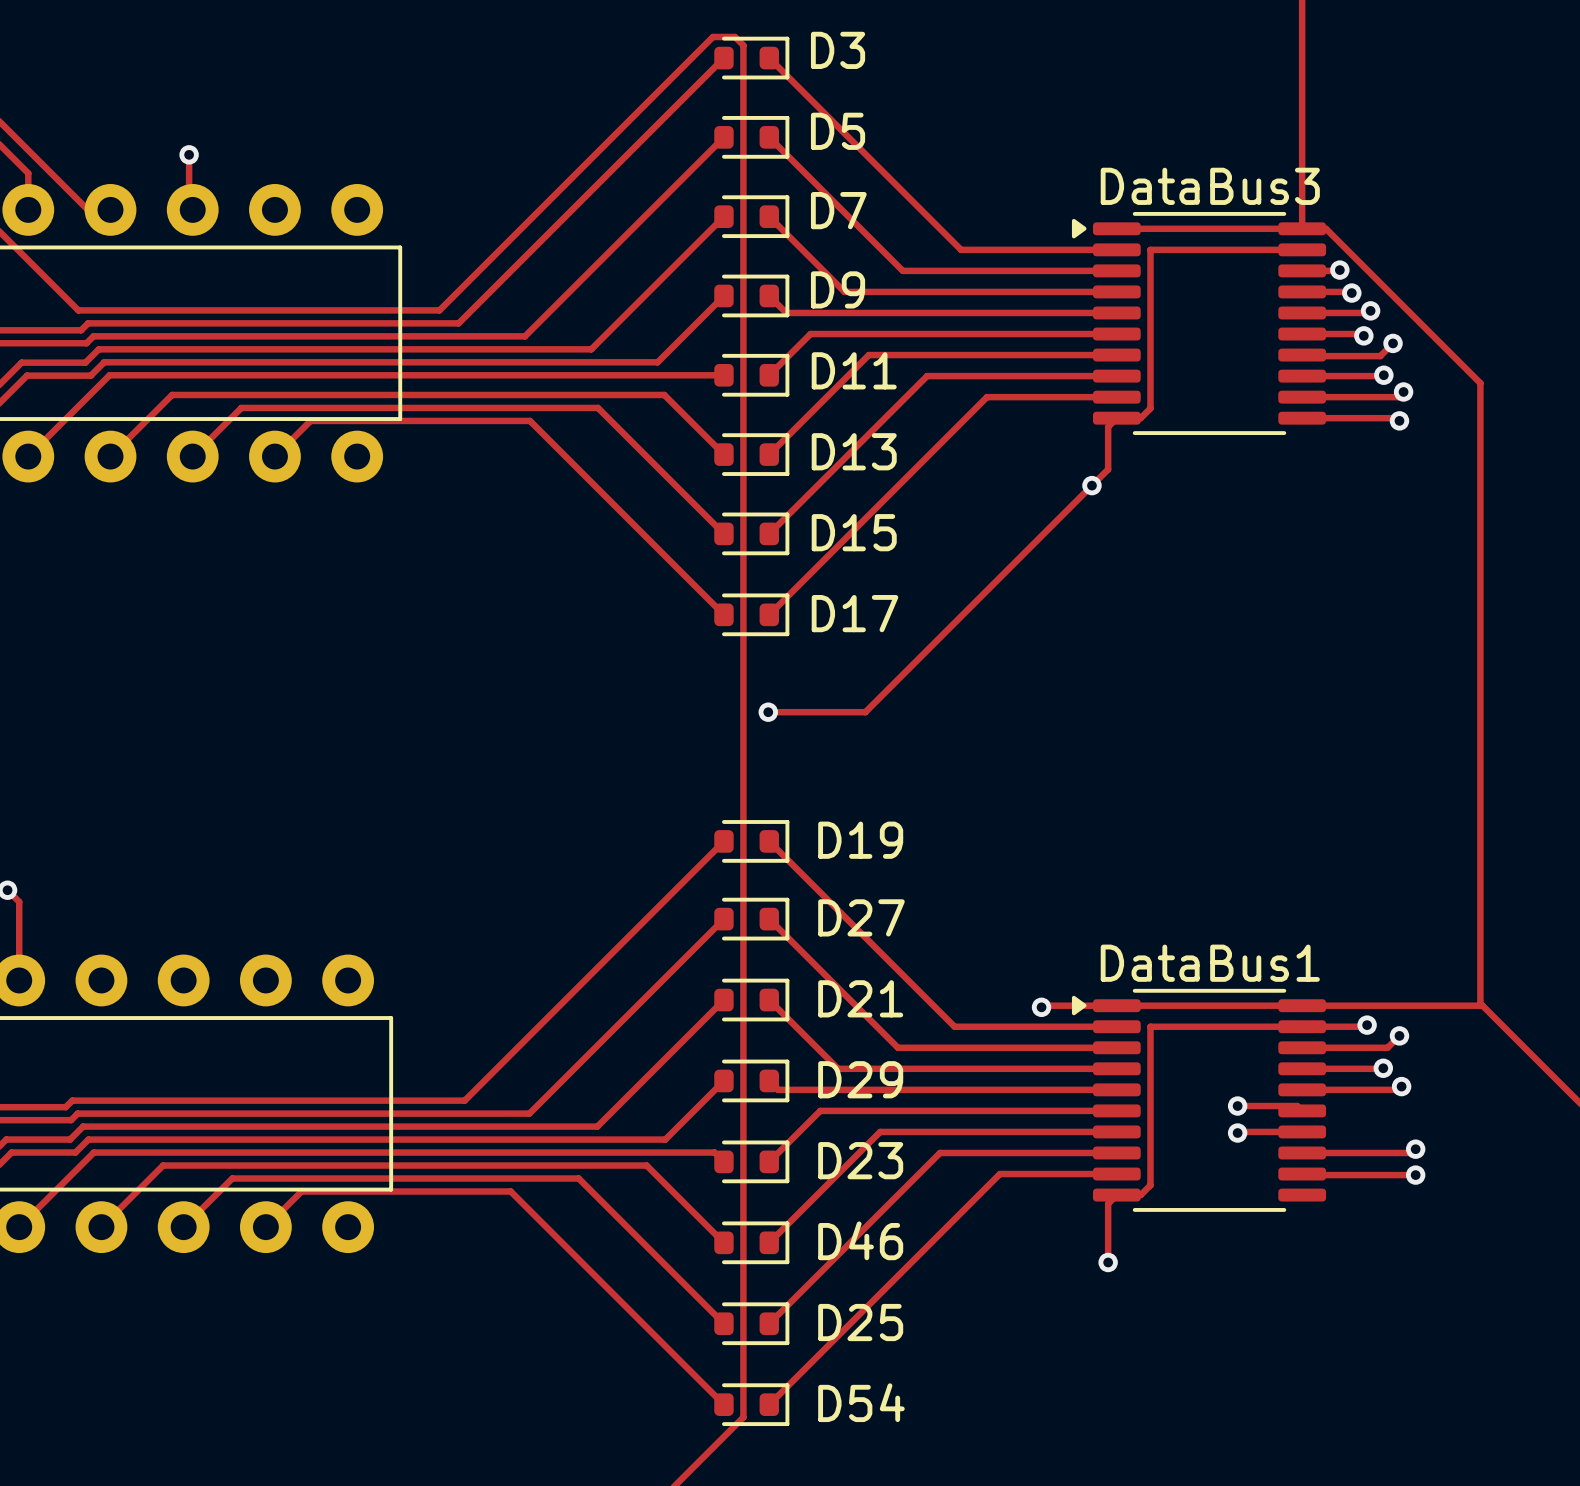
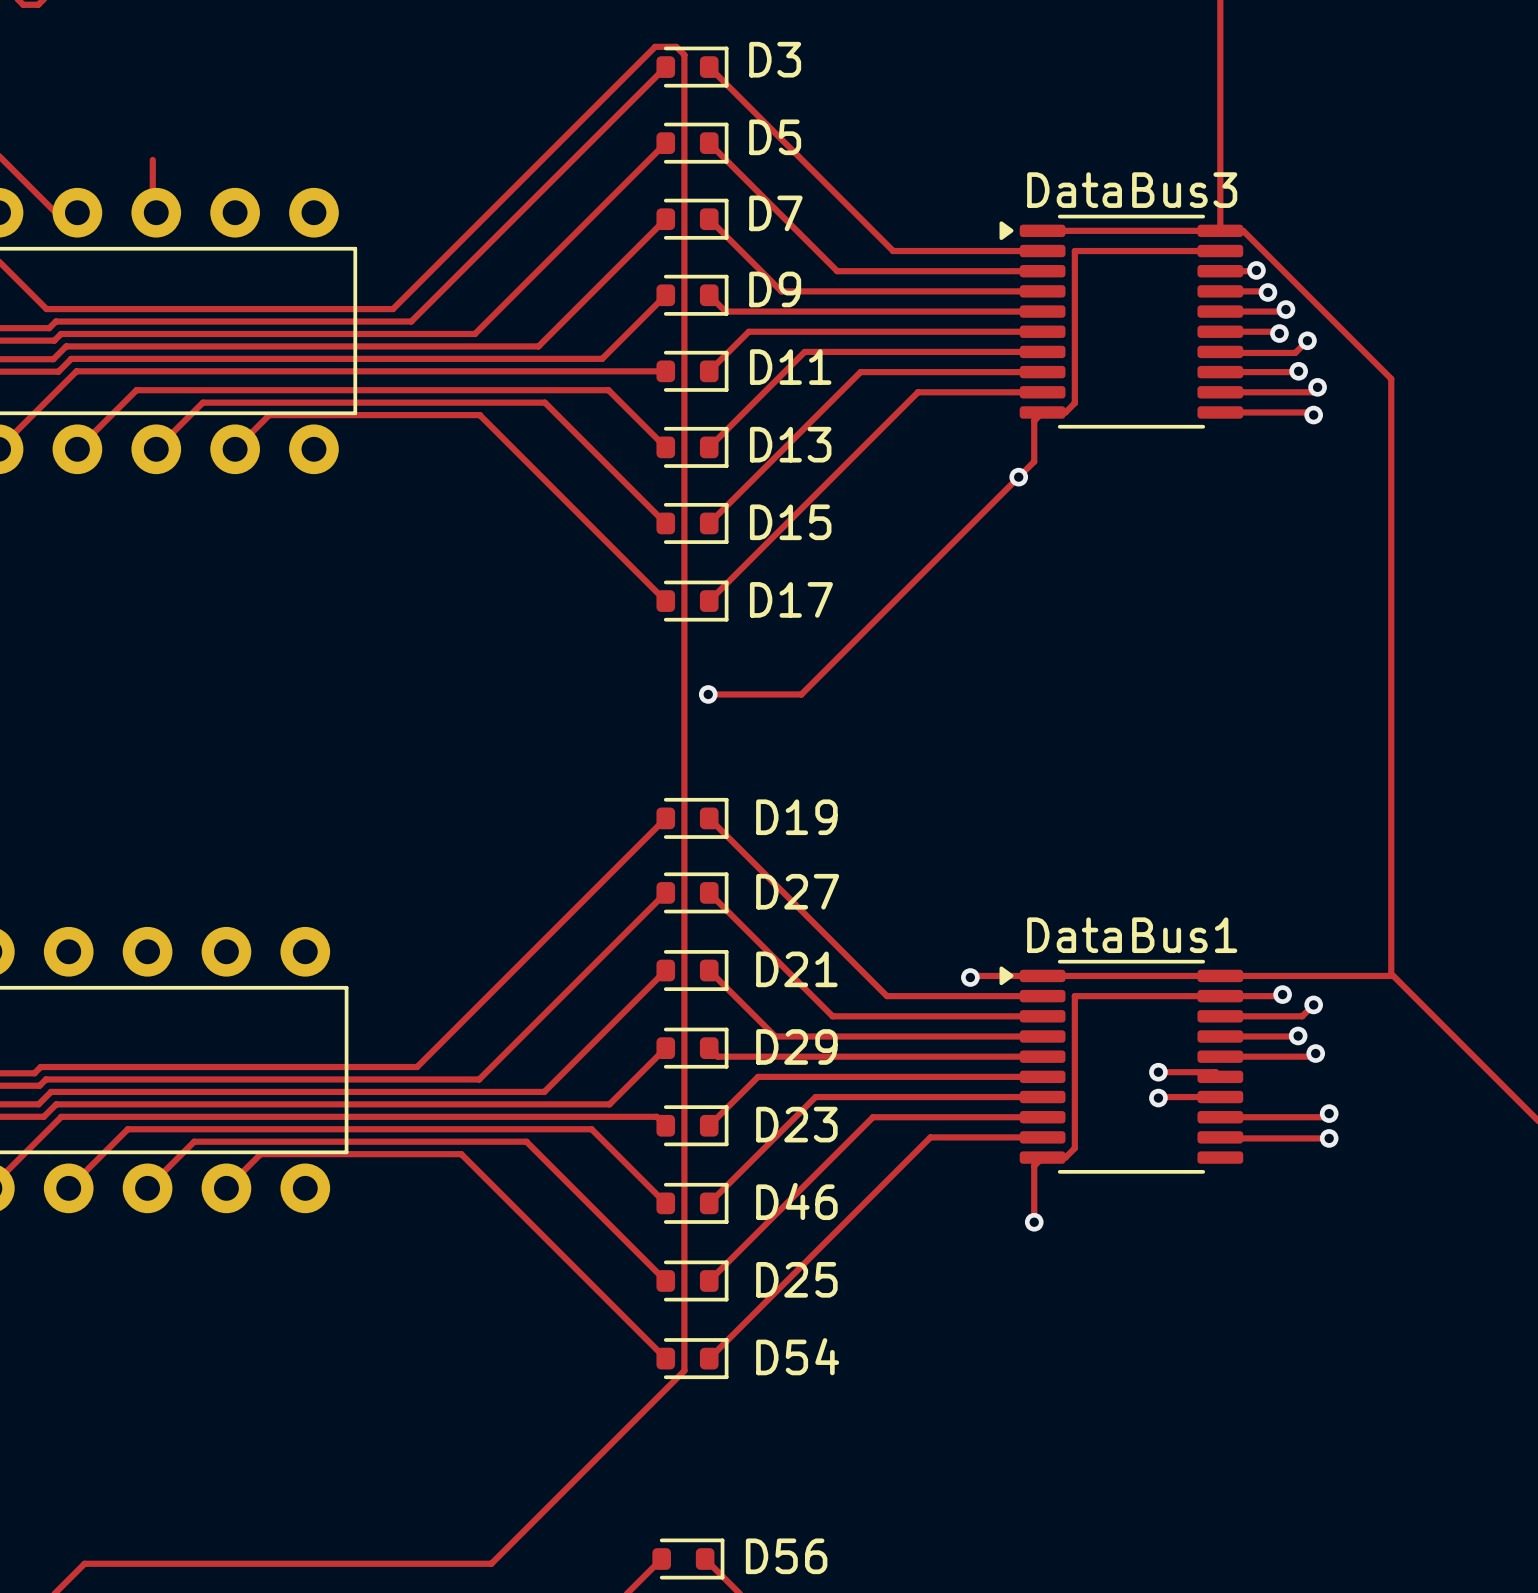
via: (189, 154) -> none

